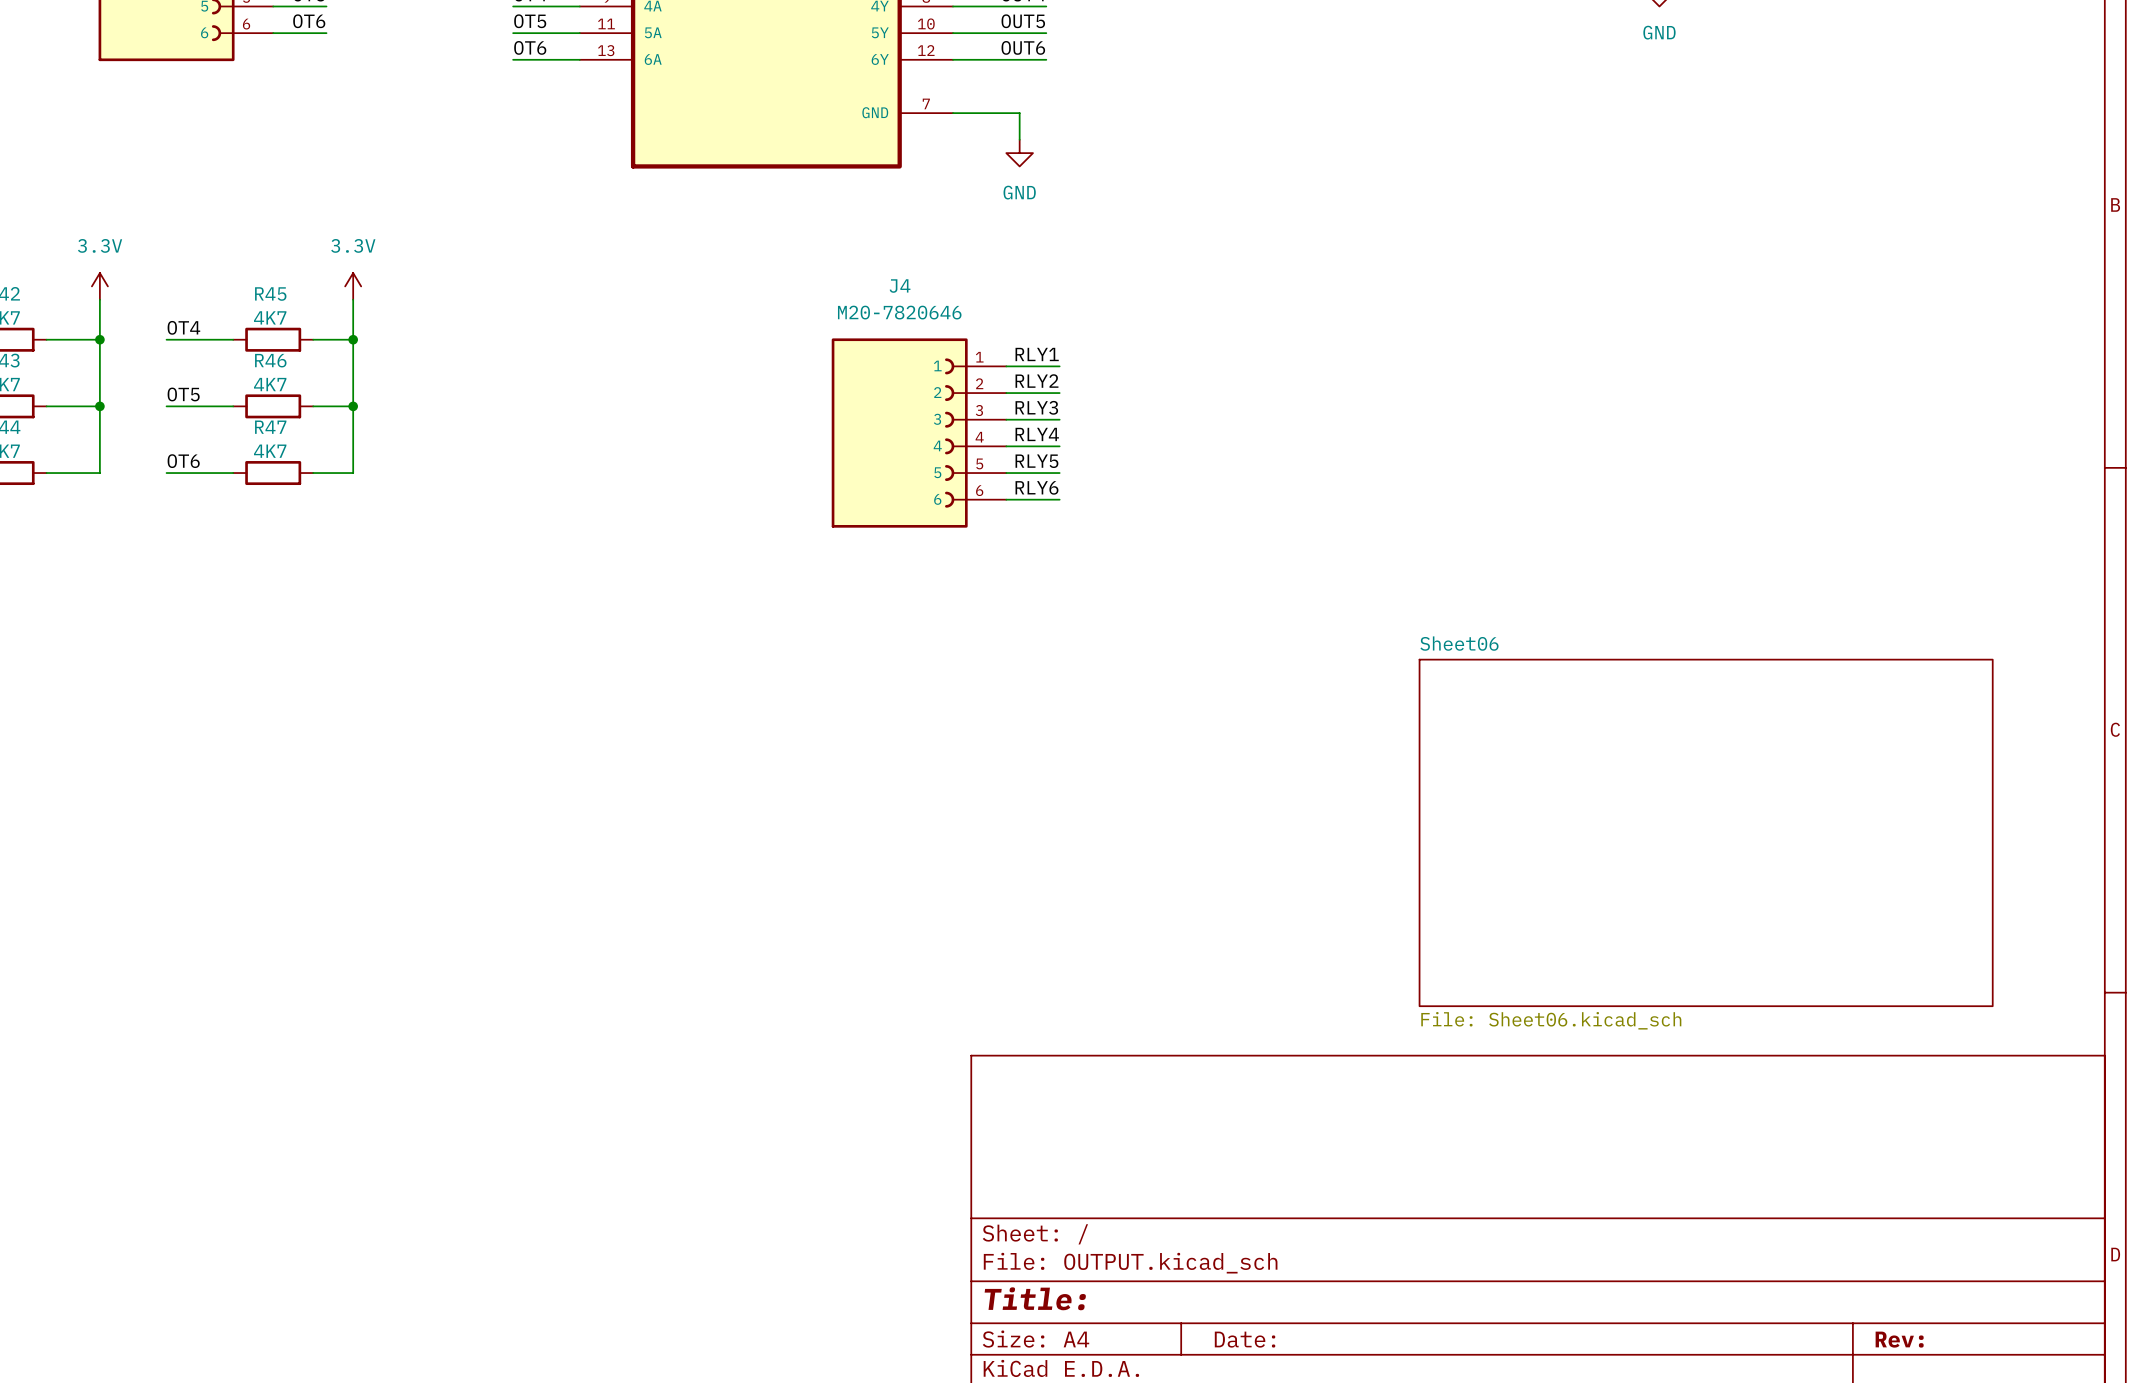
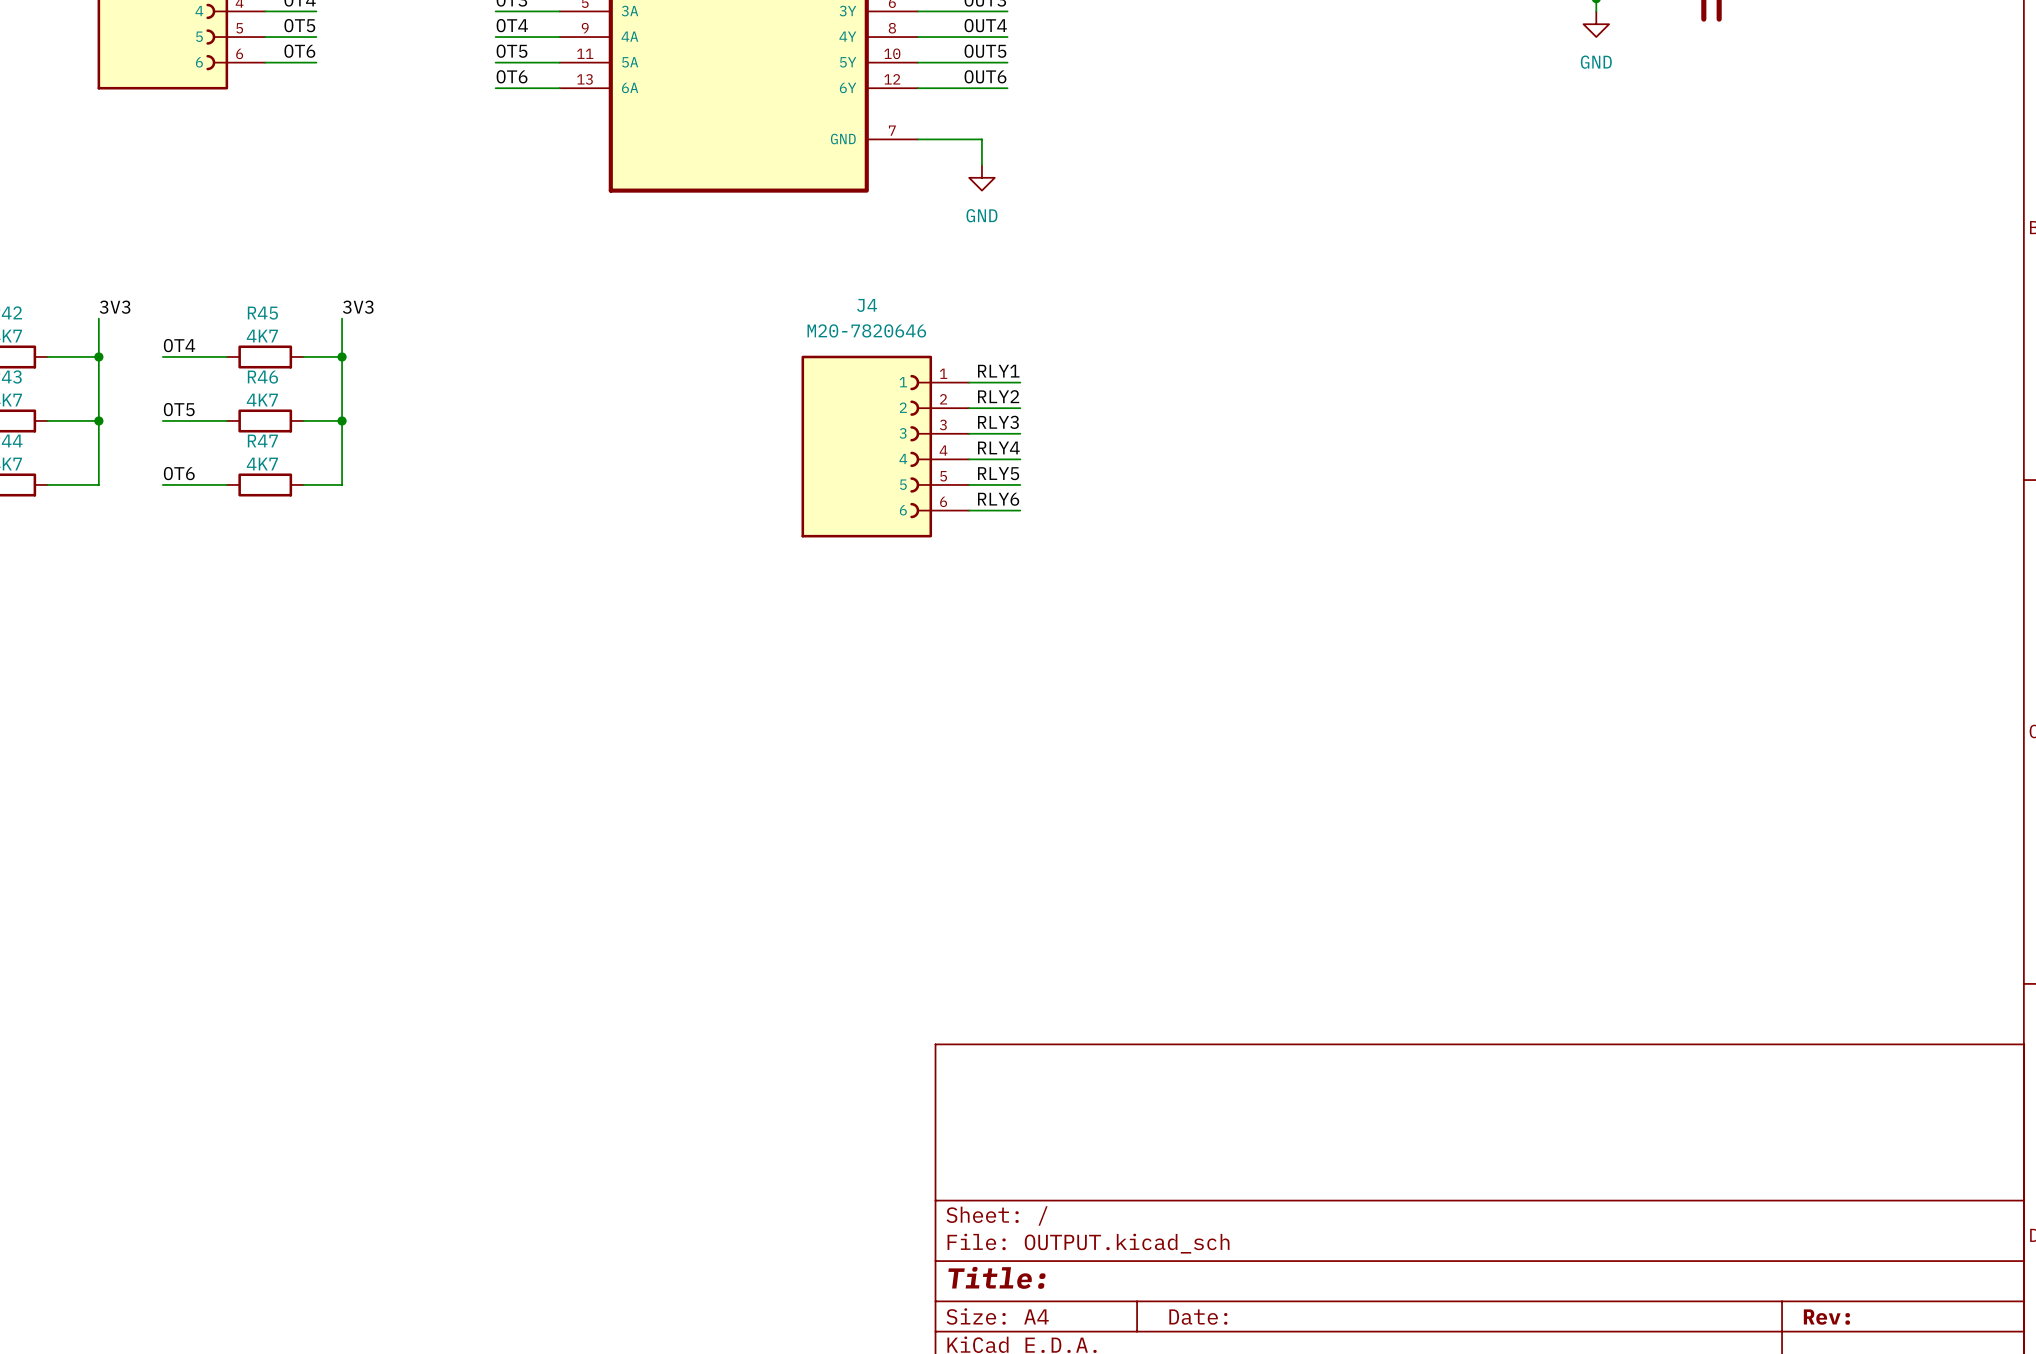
power symbol: 3.3V (99, 286) -> none
power symbol: 3.3V (353, 286) -> none
label: none -> 3V3 (115, 307)
label: none -> 3V3 (358, 307)
sheet Sheet06: File: Sheet06.kicad_sch (1706, 832) -> none

